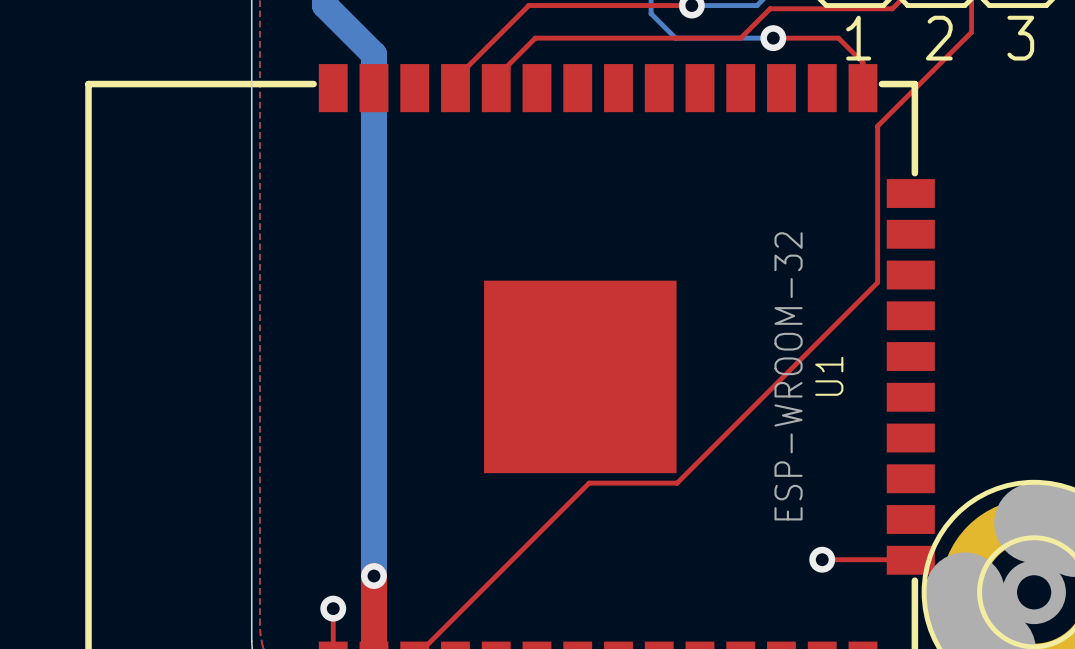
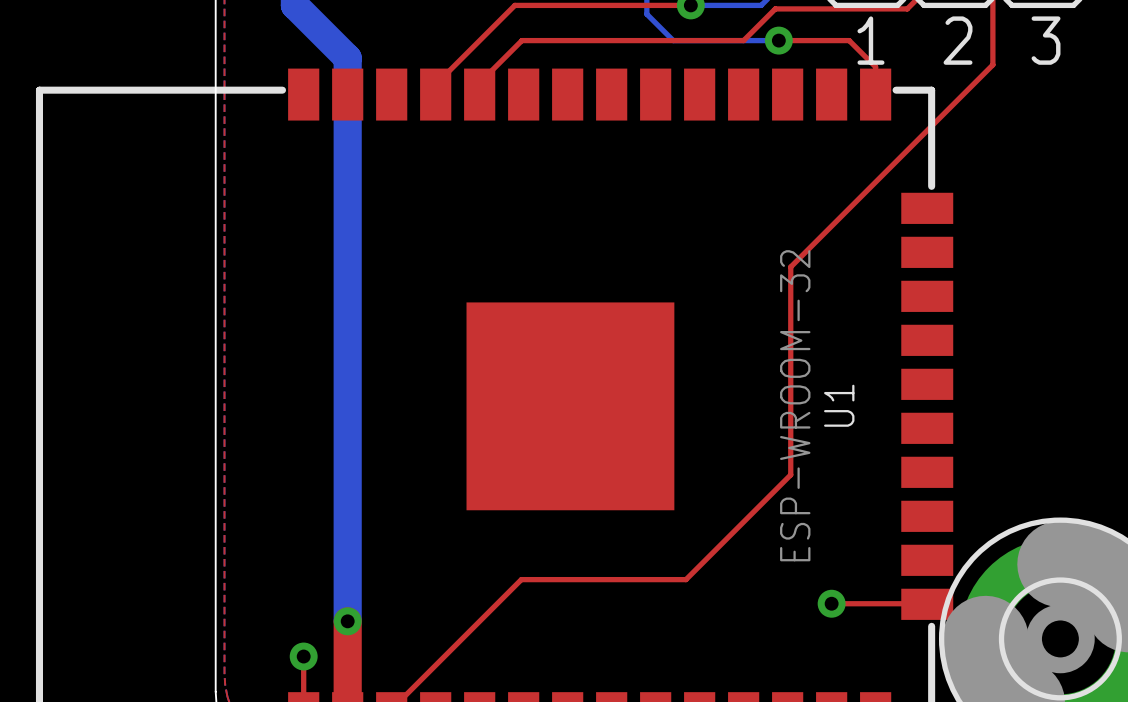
top track: (971, 32) (877, 126) (877, 282) (677, 483) (589, 483) (534, 537) -> (992, 34) (992, 64) (790, 267) (790, 474) (686, 579) (521, 579)

